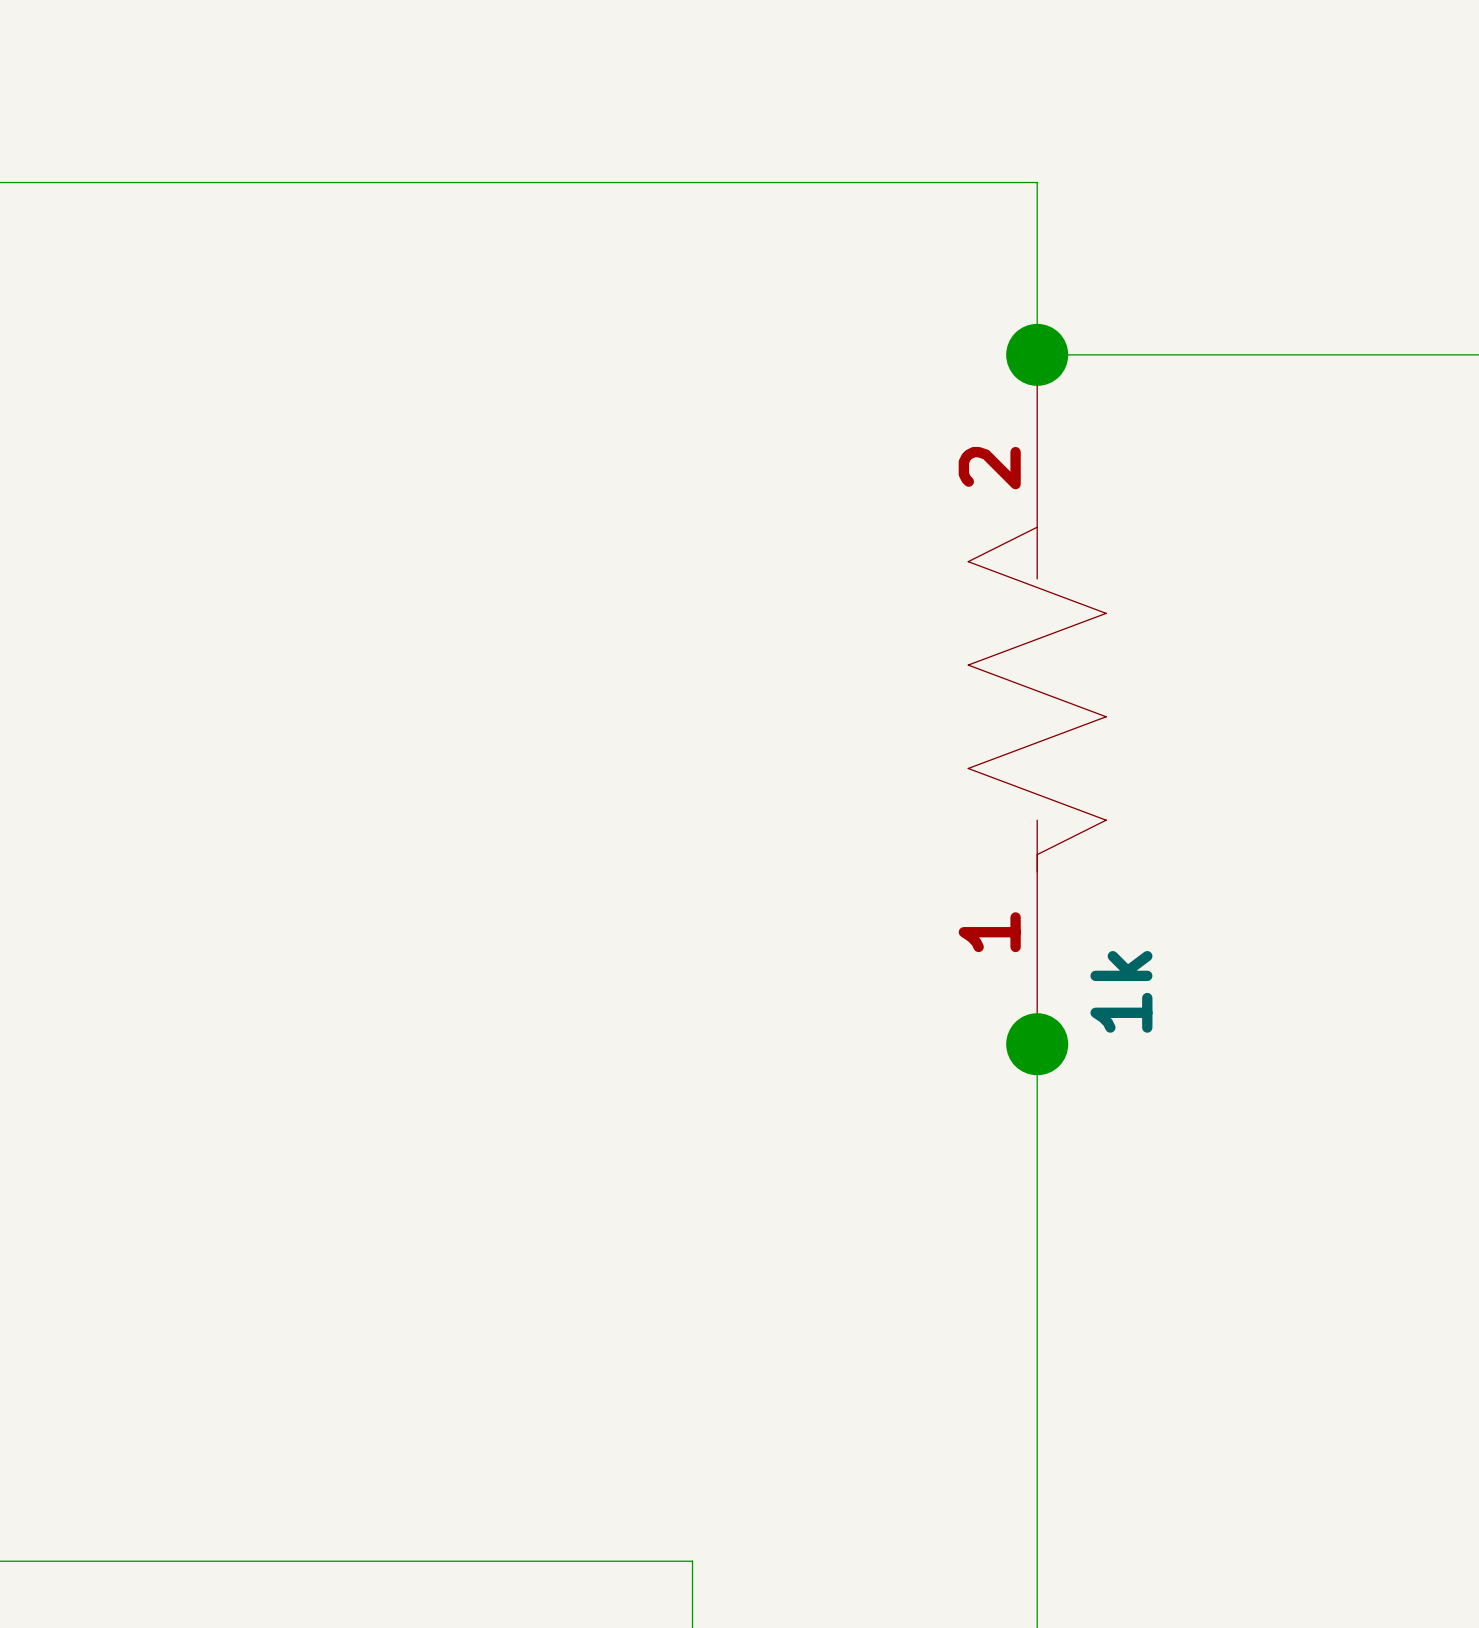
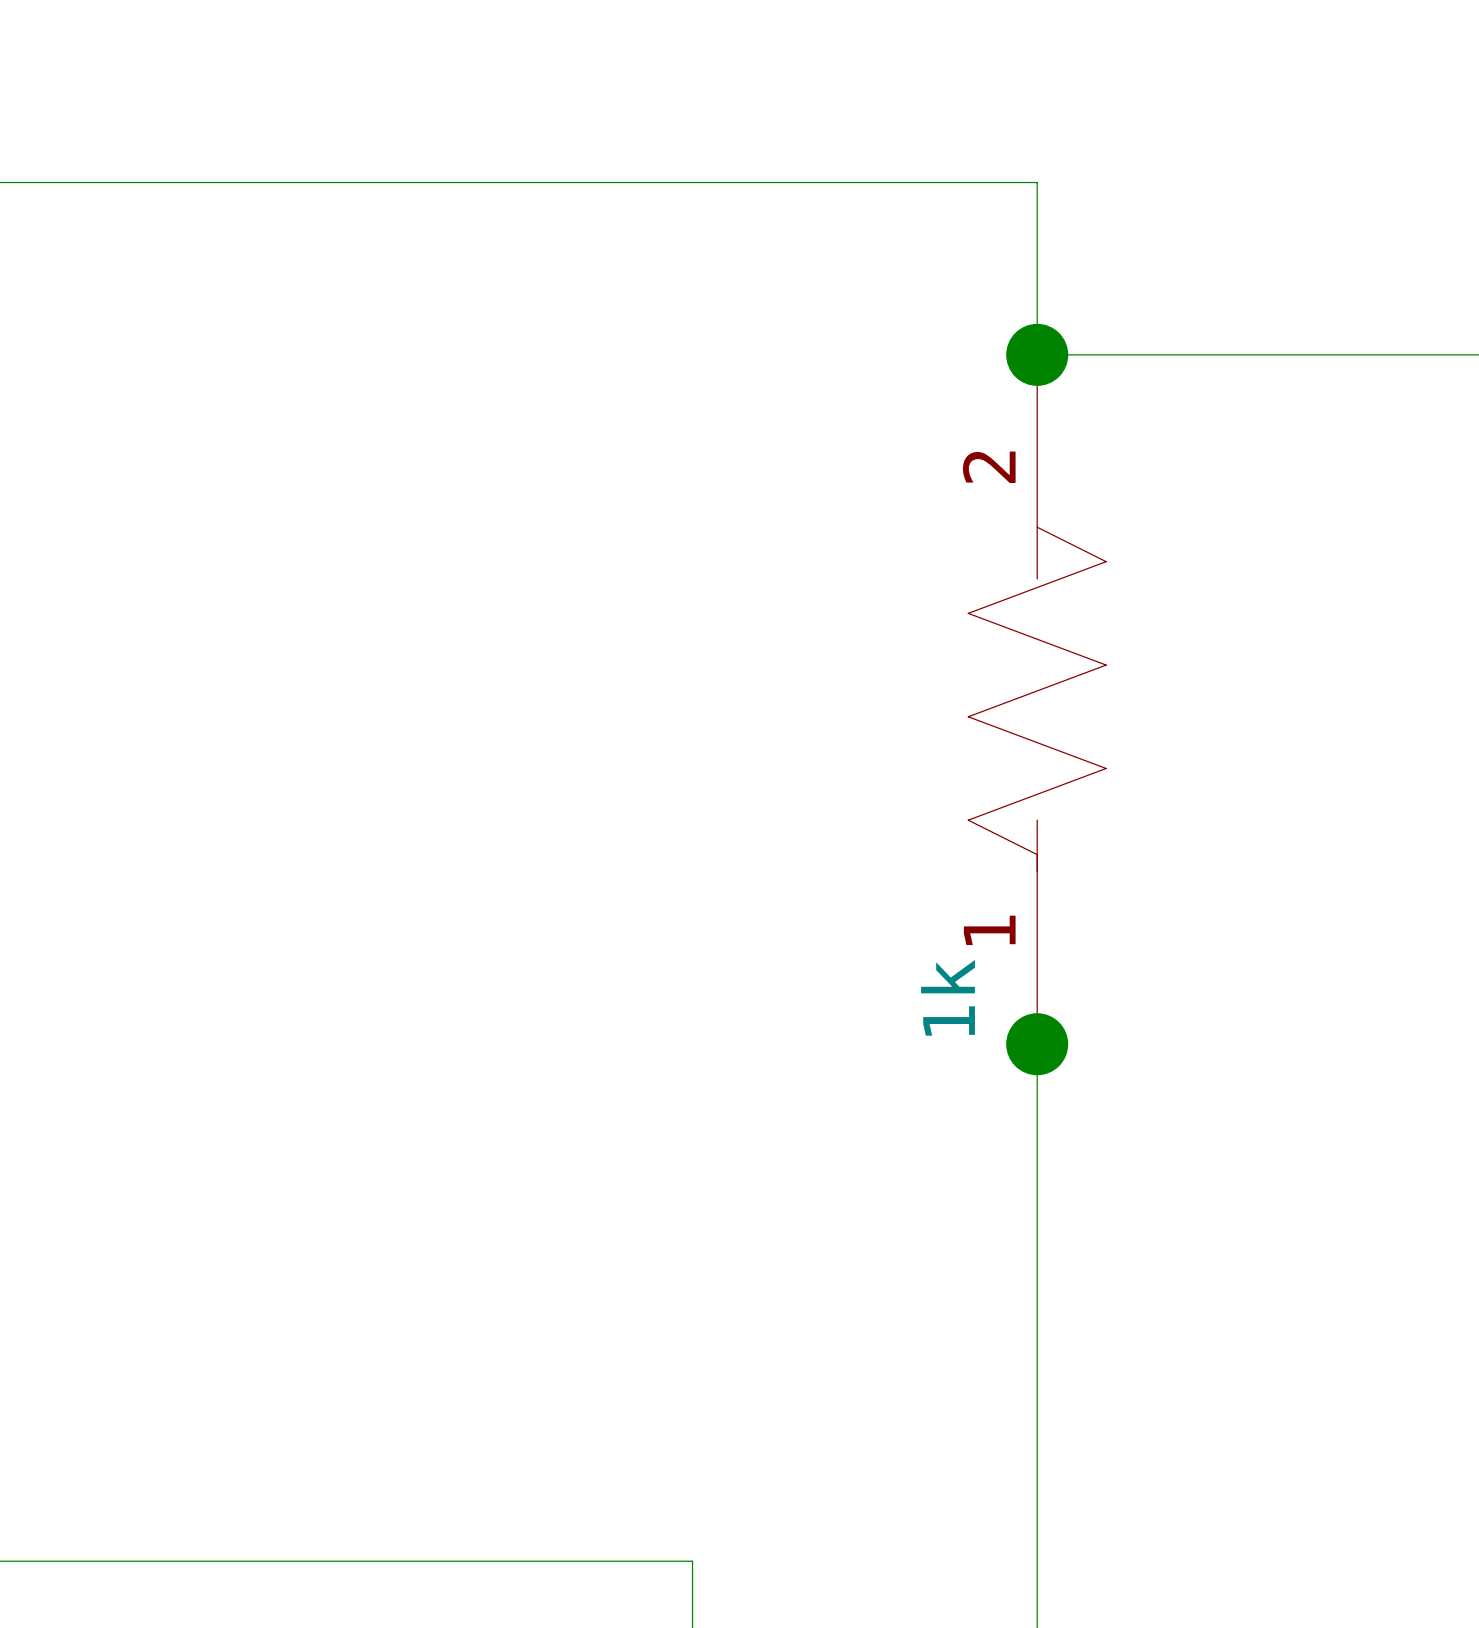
part flip: as is (1037, 699) -> left-right (1037, 699)

